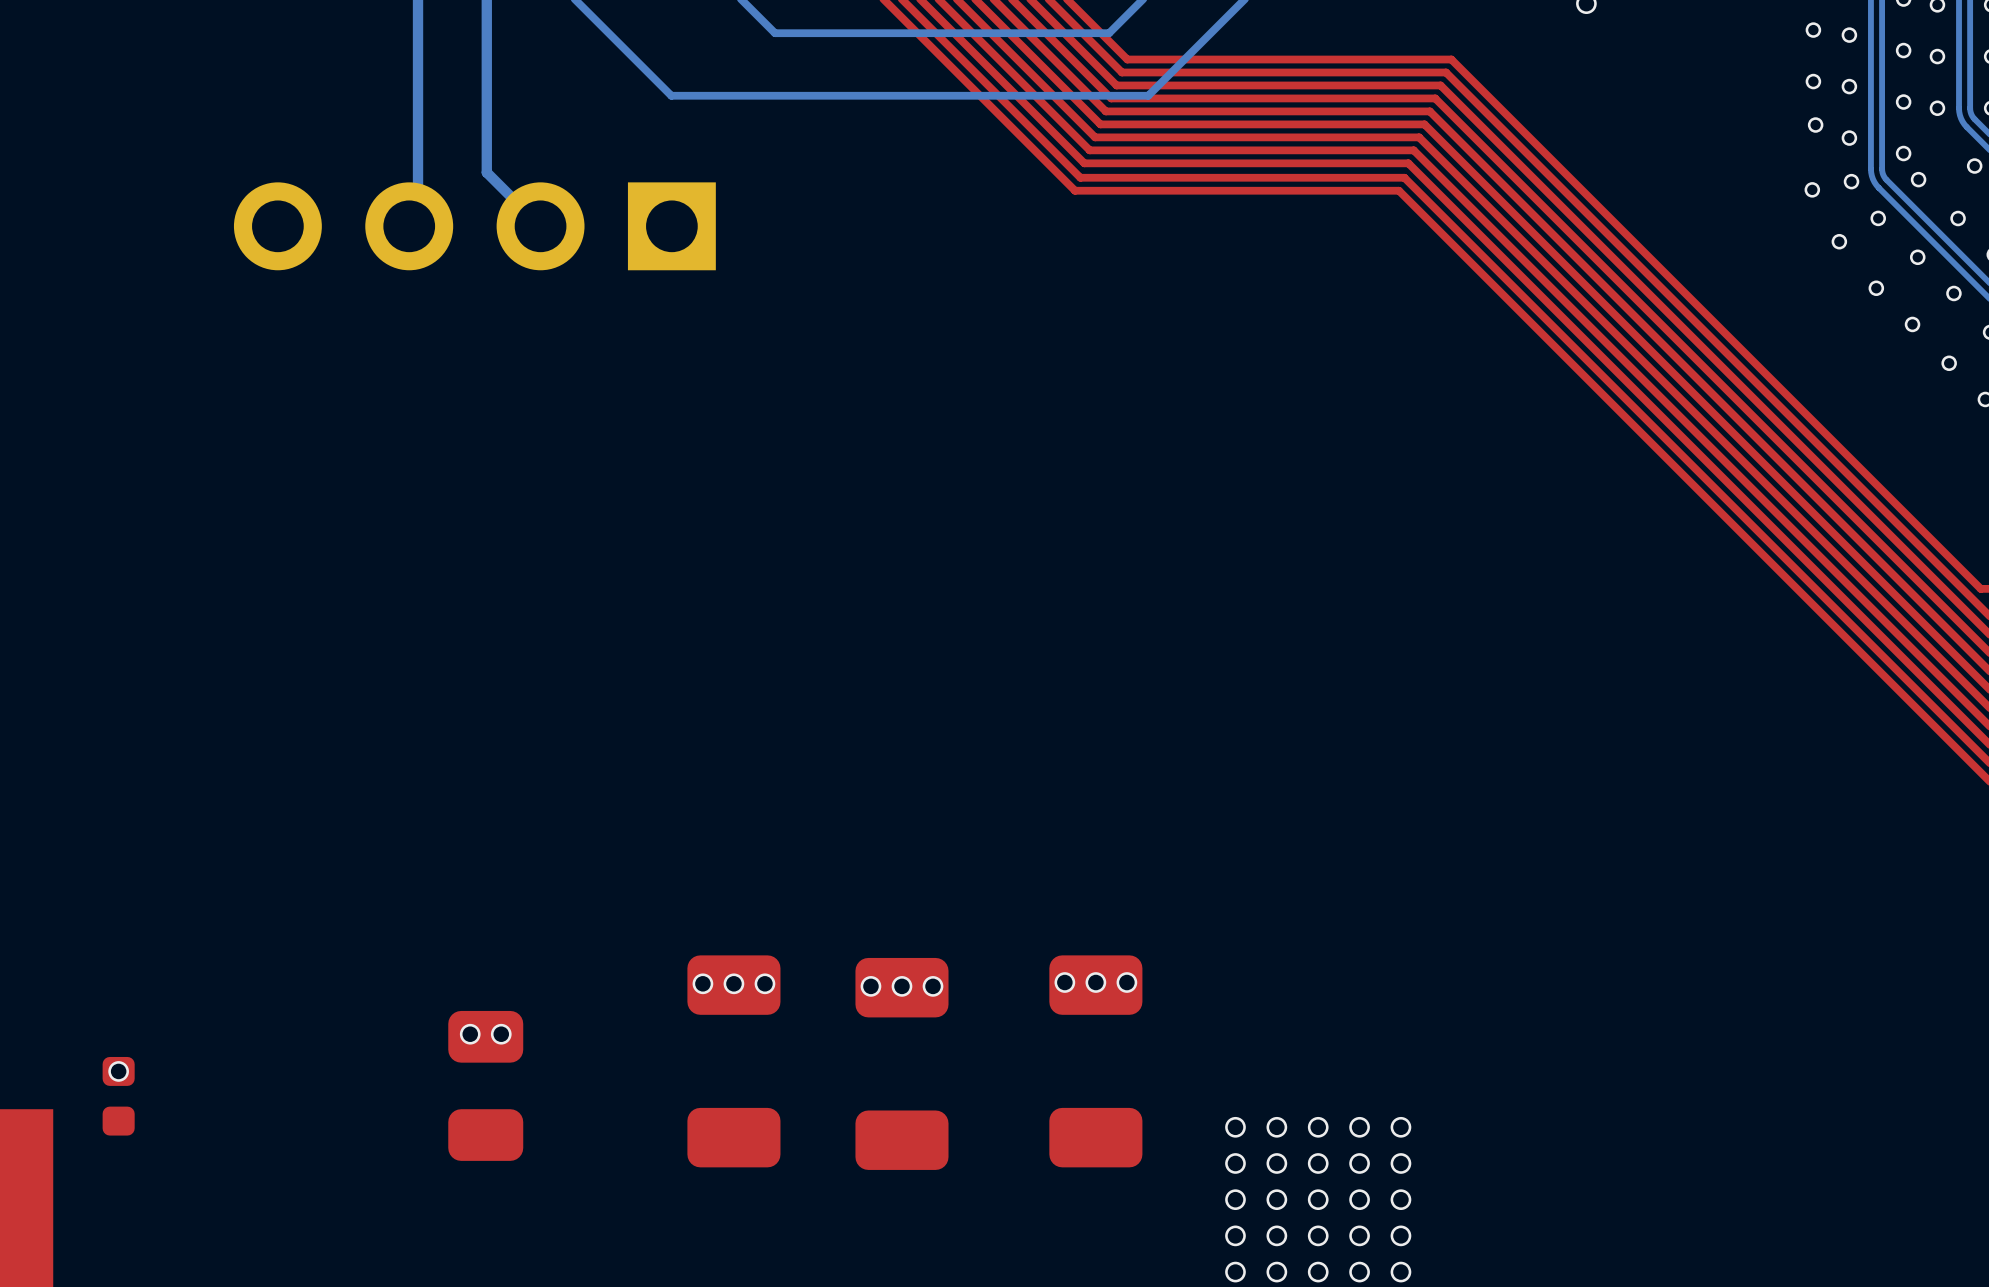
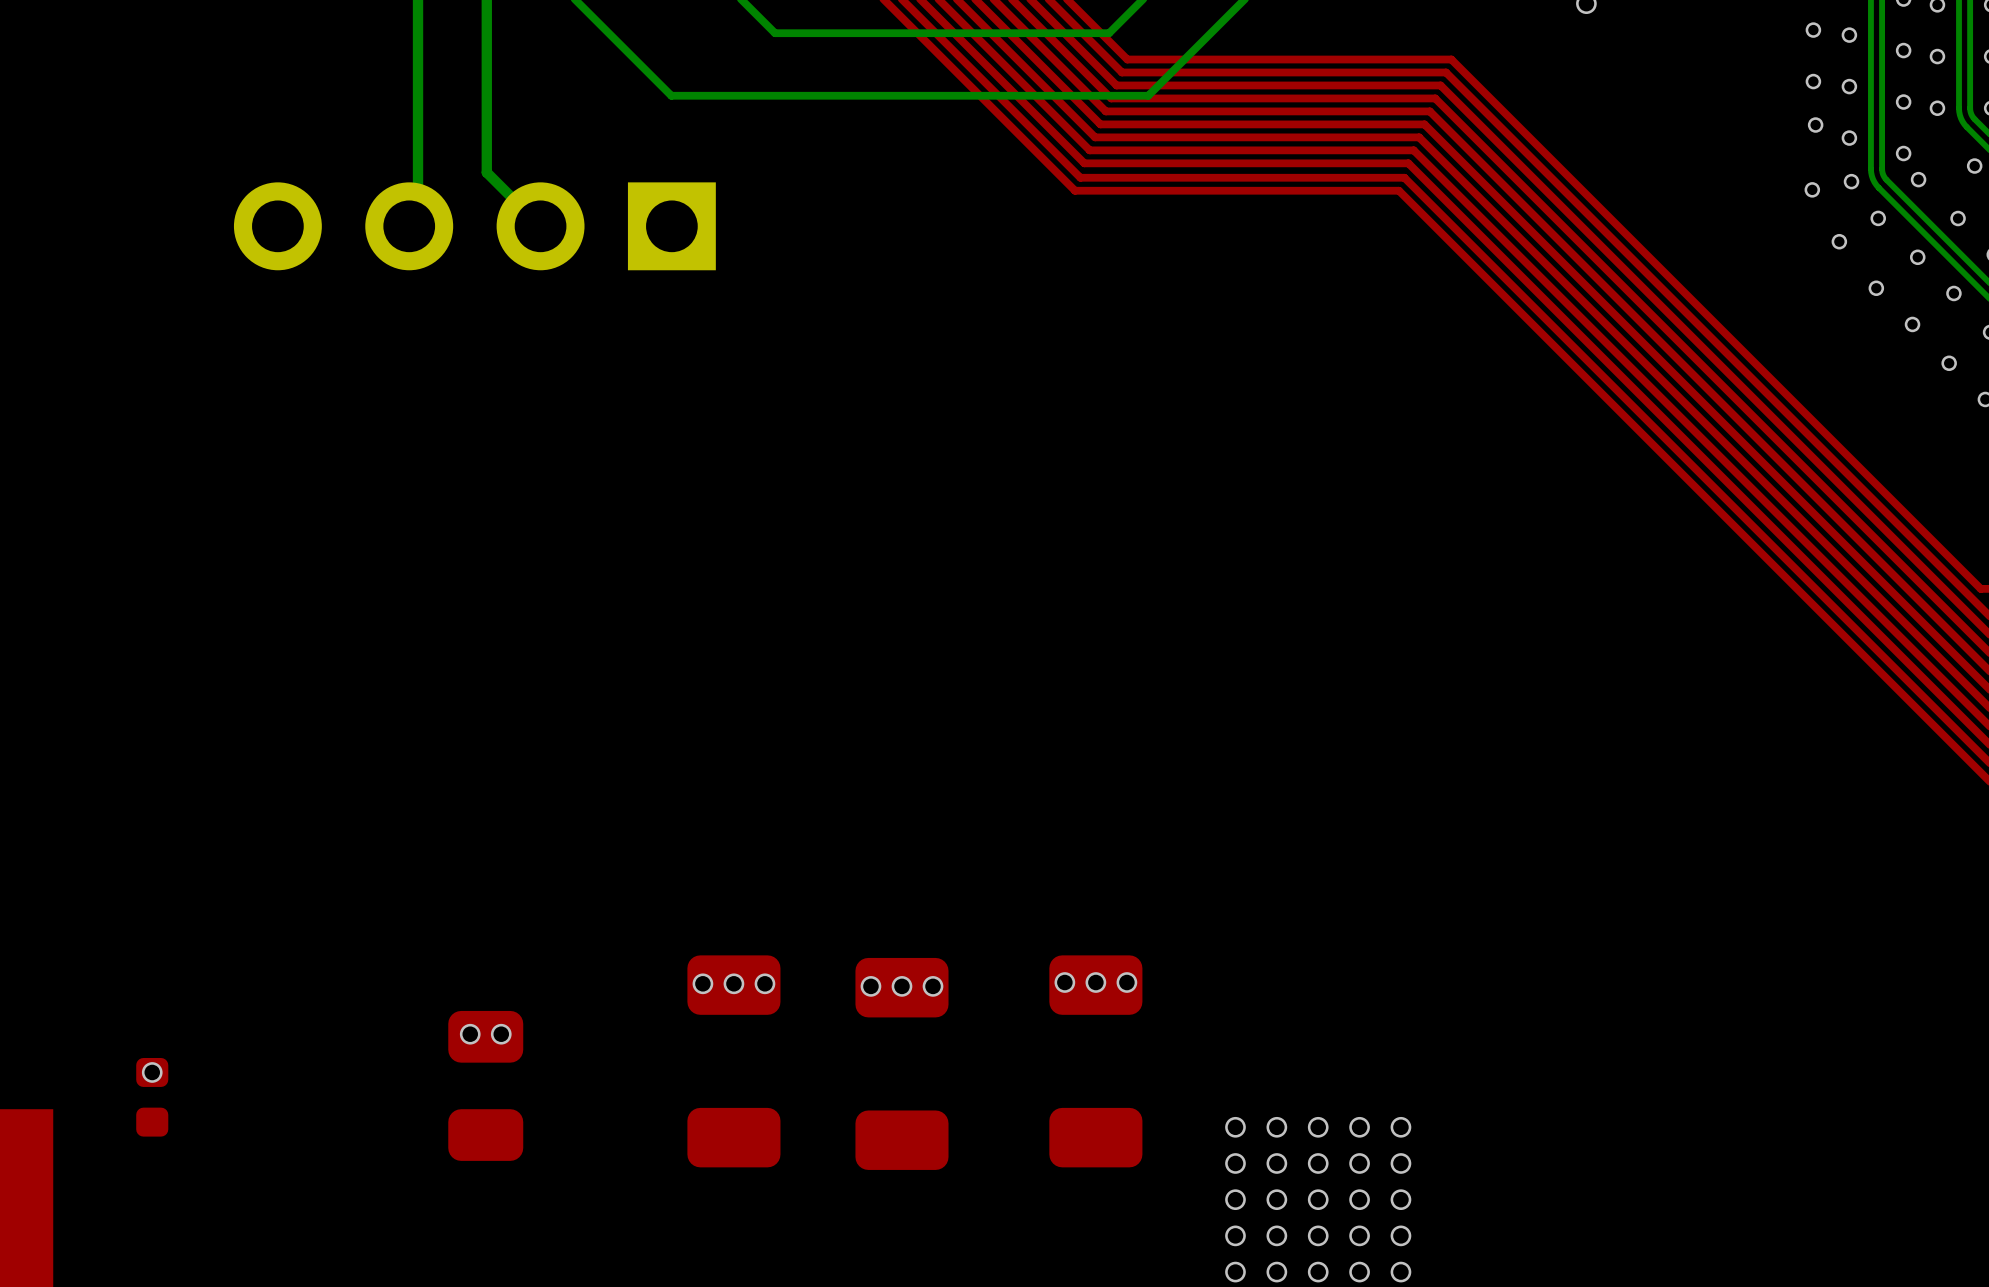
via position: (118, 1071) -> (152, 1072)
part position: (118, 1096) -> (152, 1097)

